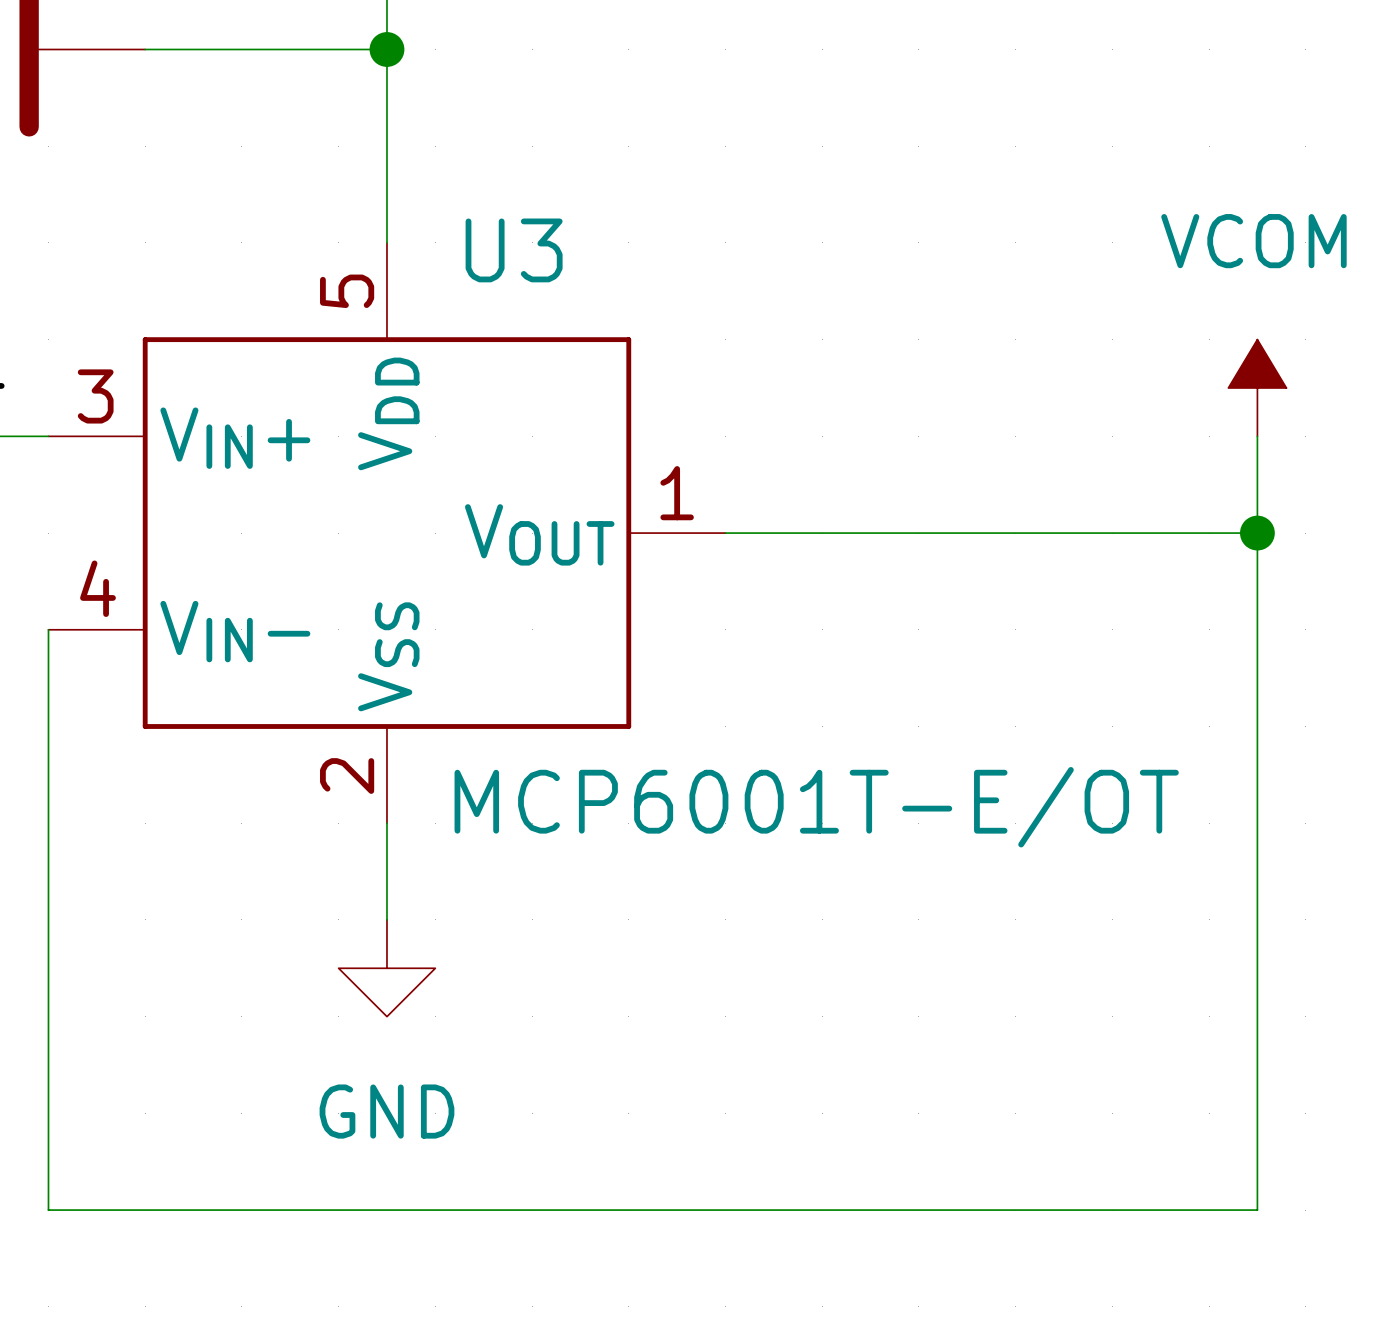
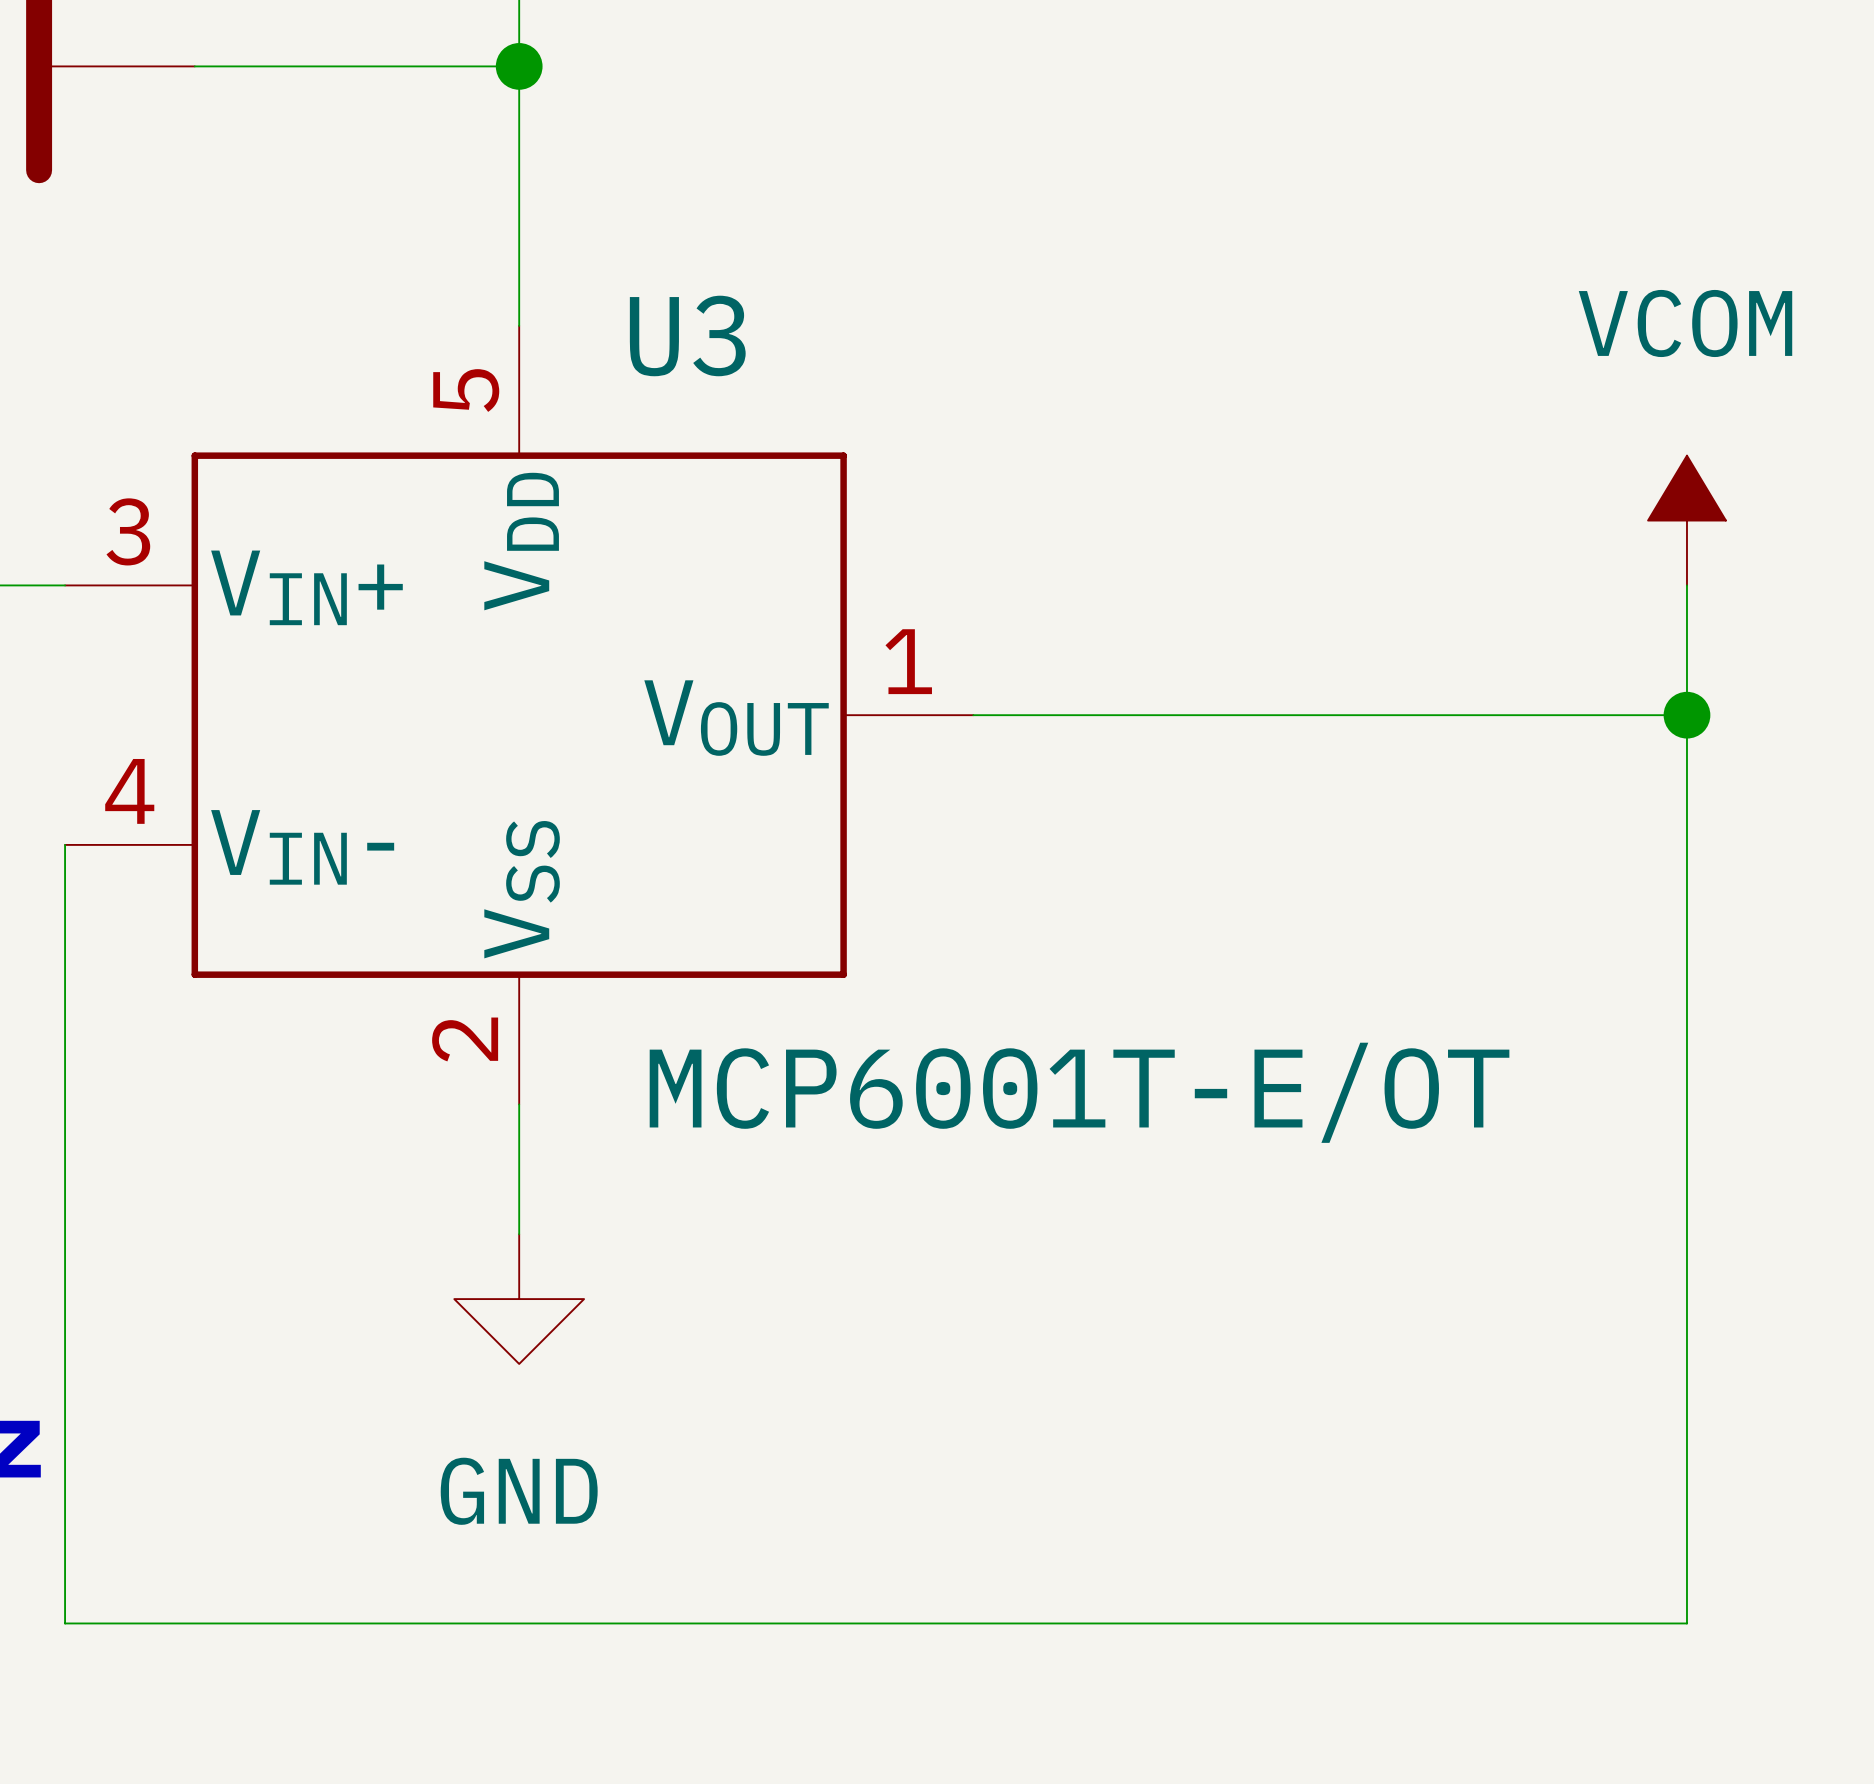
U3 value position: MCP6001T-E/OT (816, 807) -> MCP6001T-E/OT (1079, 1092)

